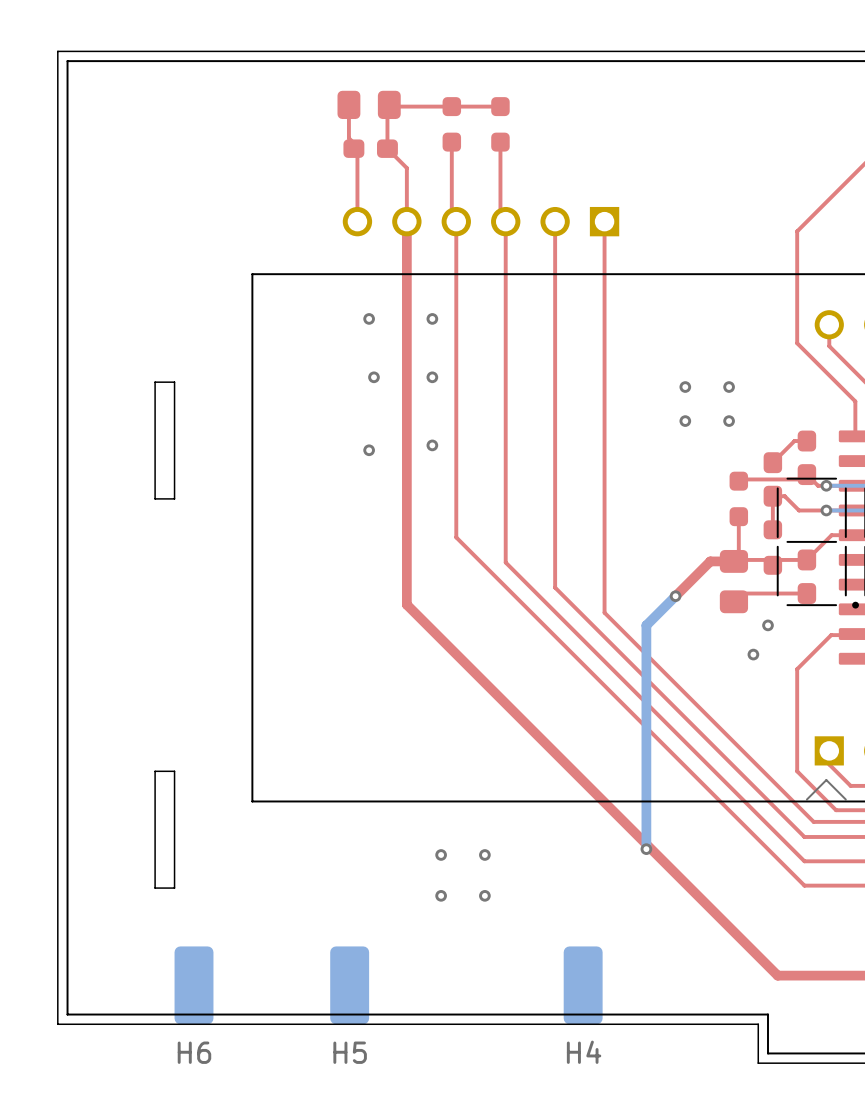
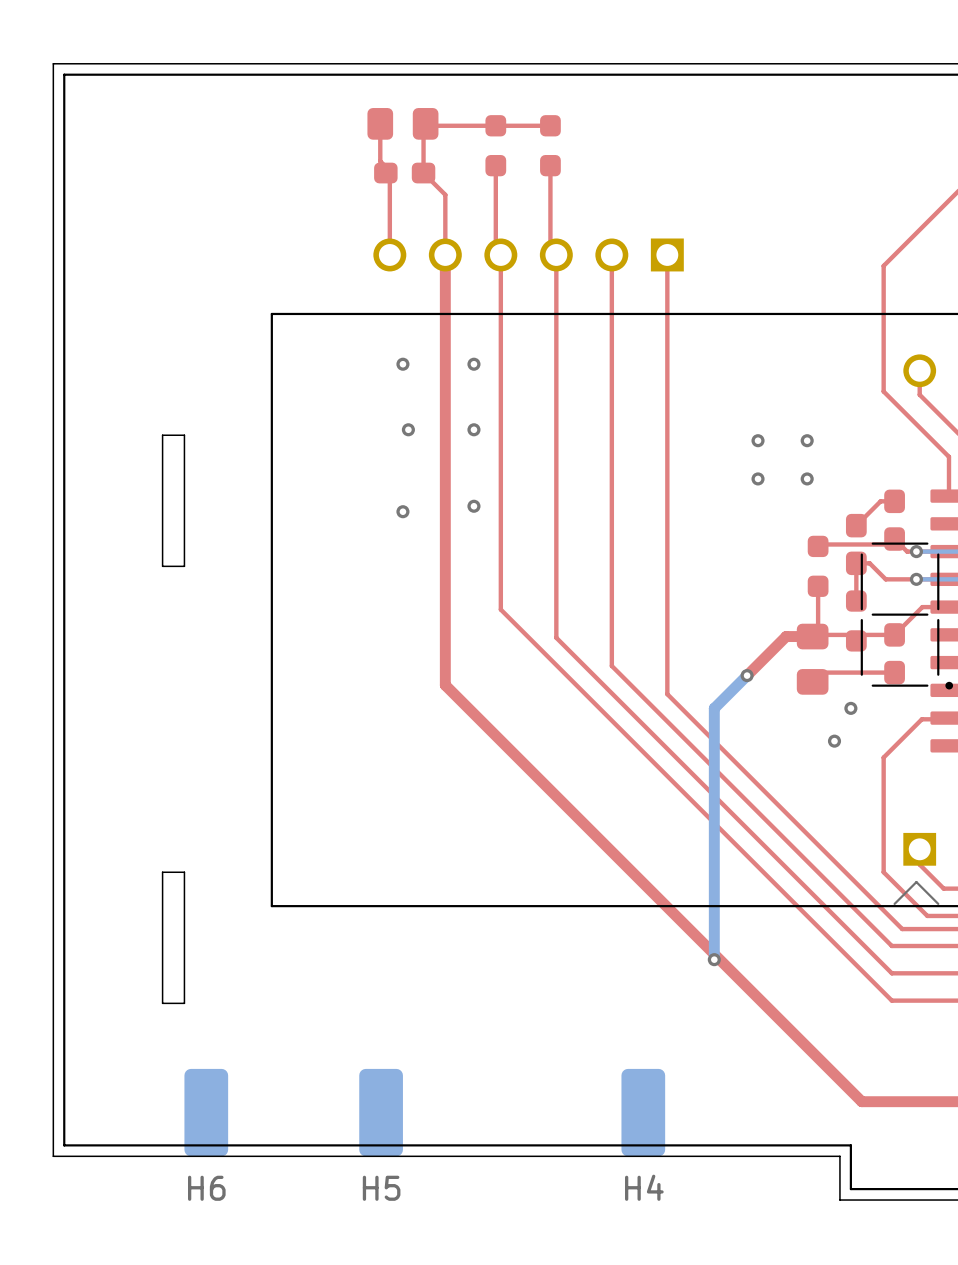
via: (441, 854) -> none
via: (484, 854) -> none
via: (441, 895) -> none
via: (484, 895) -> none

